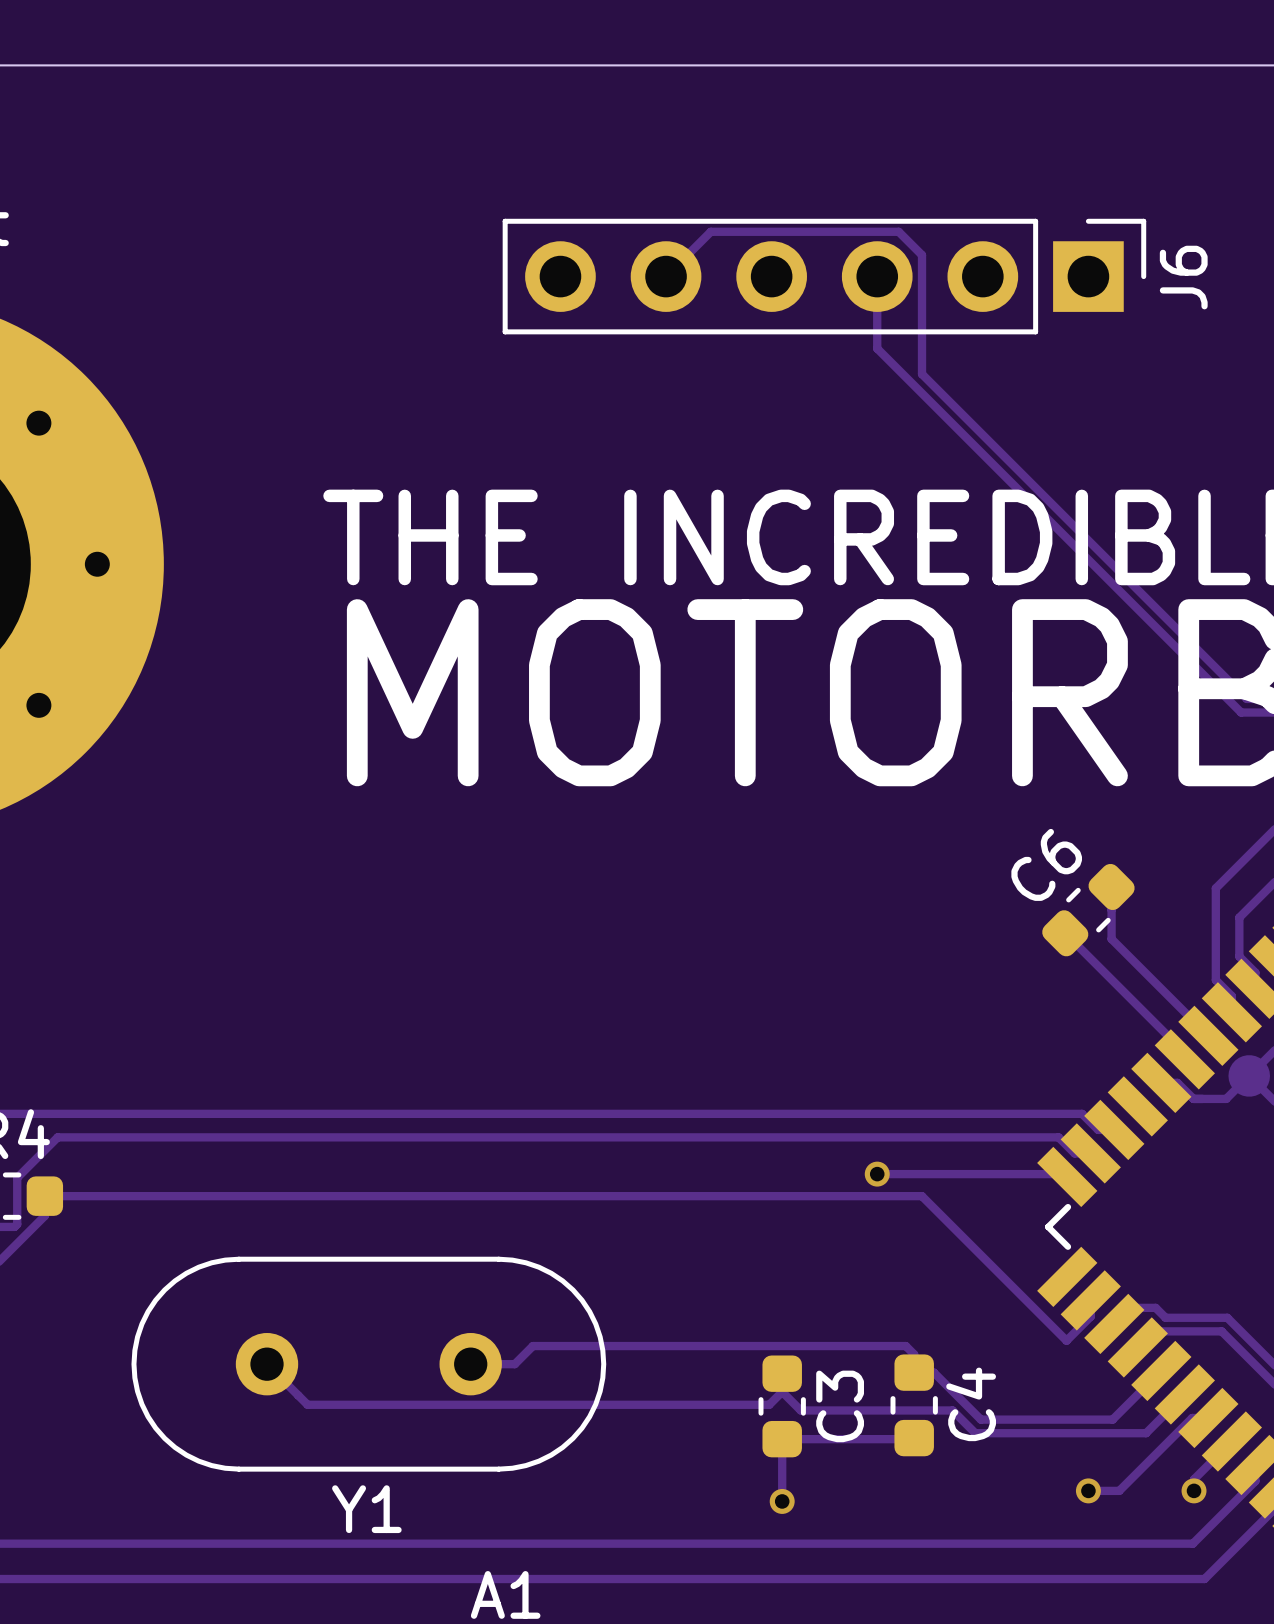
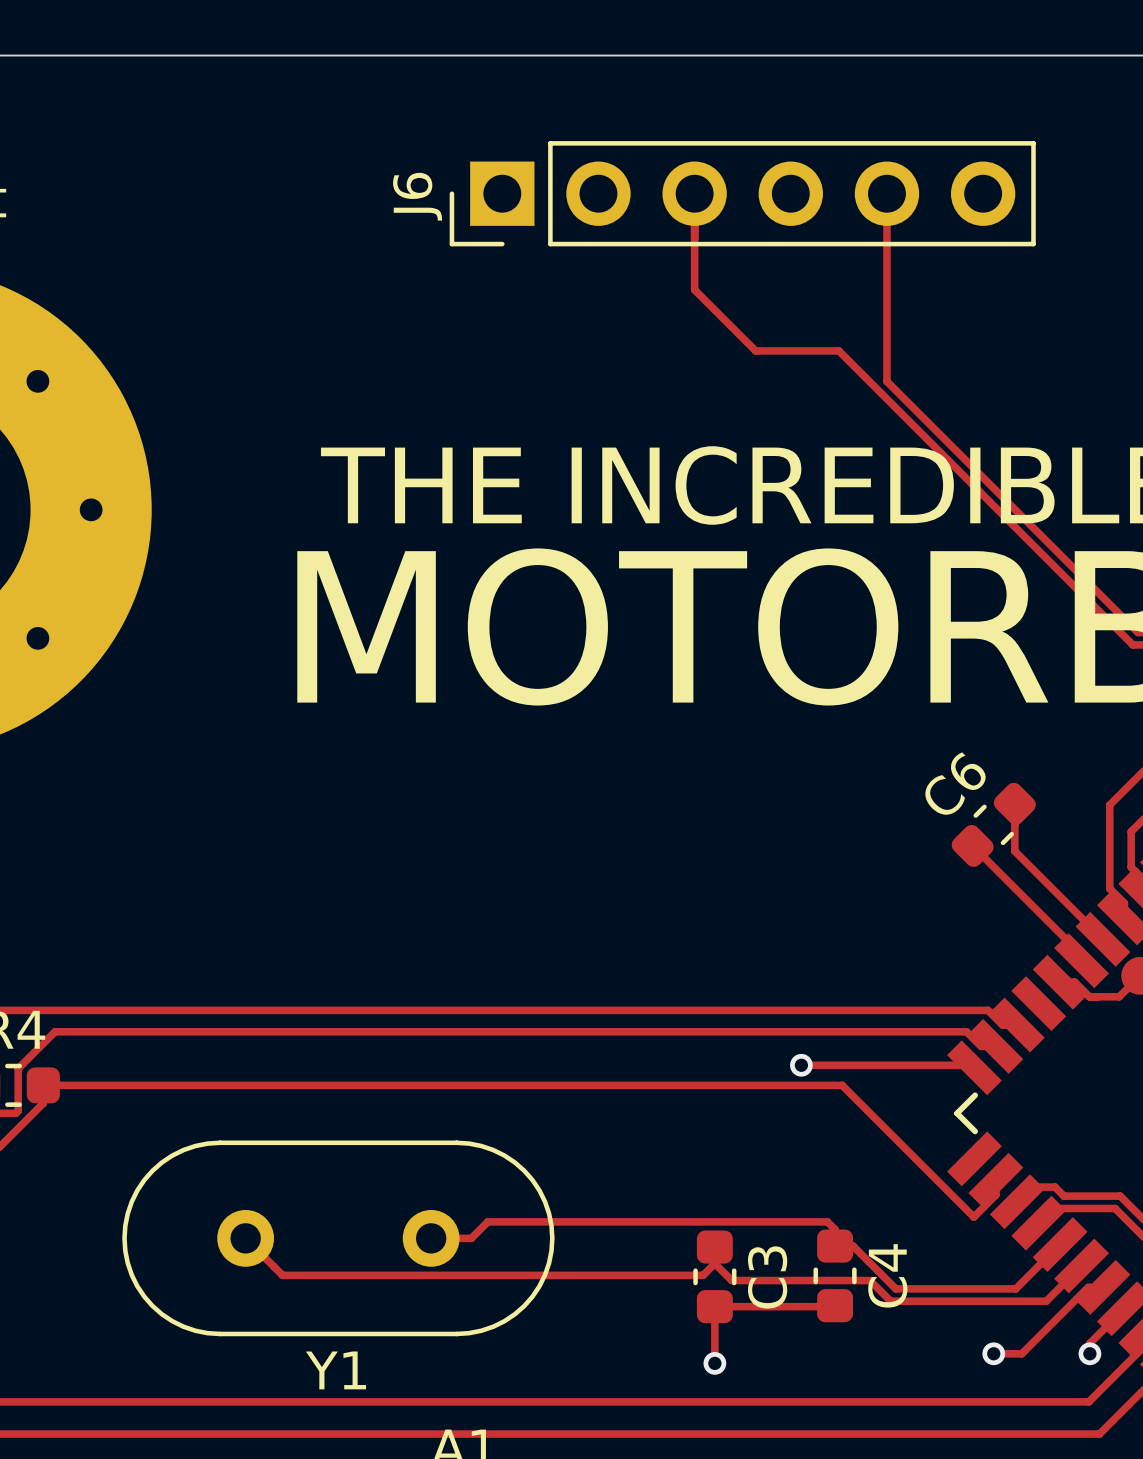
track: (666, 276) (710, 231) (898, 231) (922, 255) (922, 374) (971, 423) -> (886, 193) (886, 381)
J6 rotation: 0° (824, 276) -> 180° (742, 193)
track: (877, 276) (877, 348) (918, 389) -> (694, 193) (694, 289) (755, 350) (838, 350)

